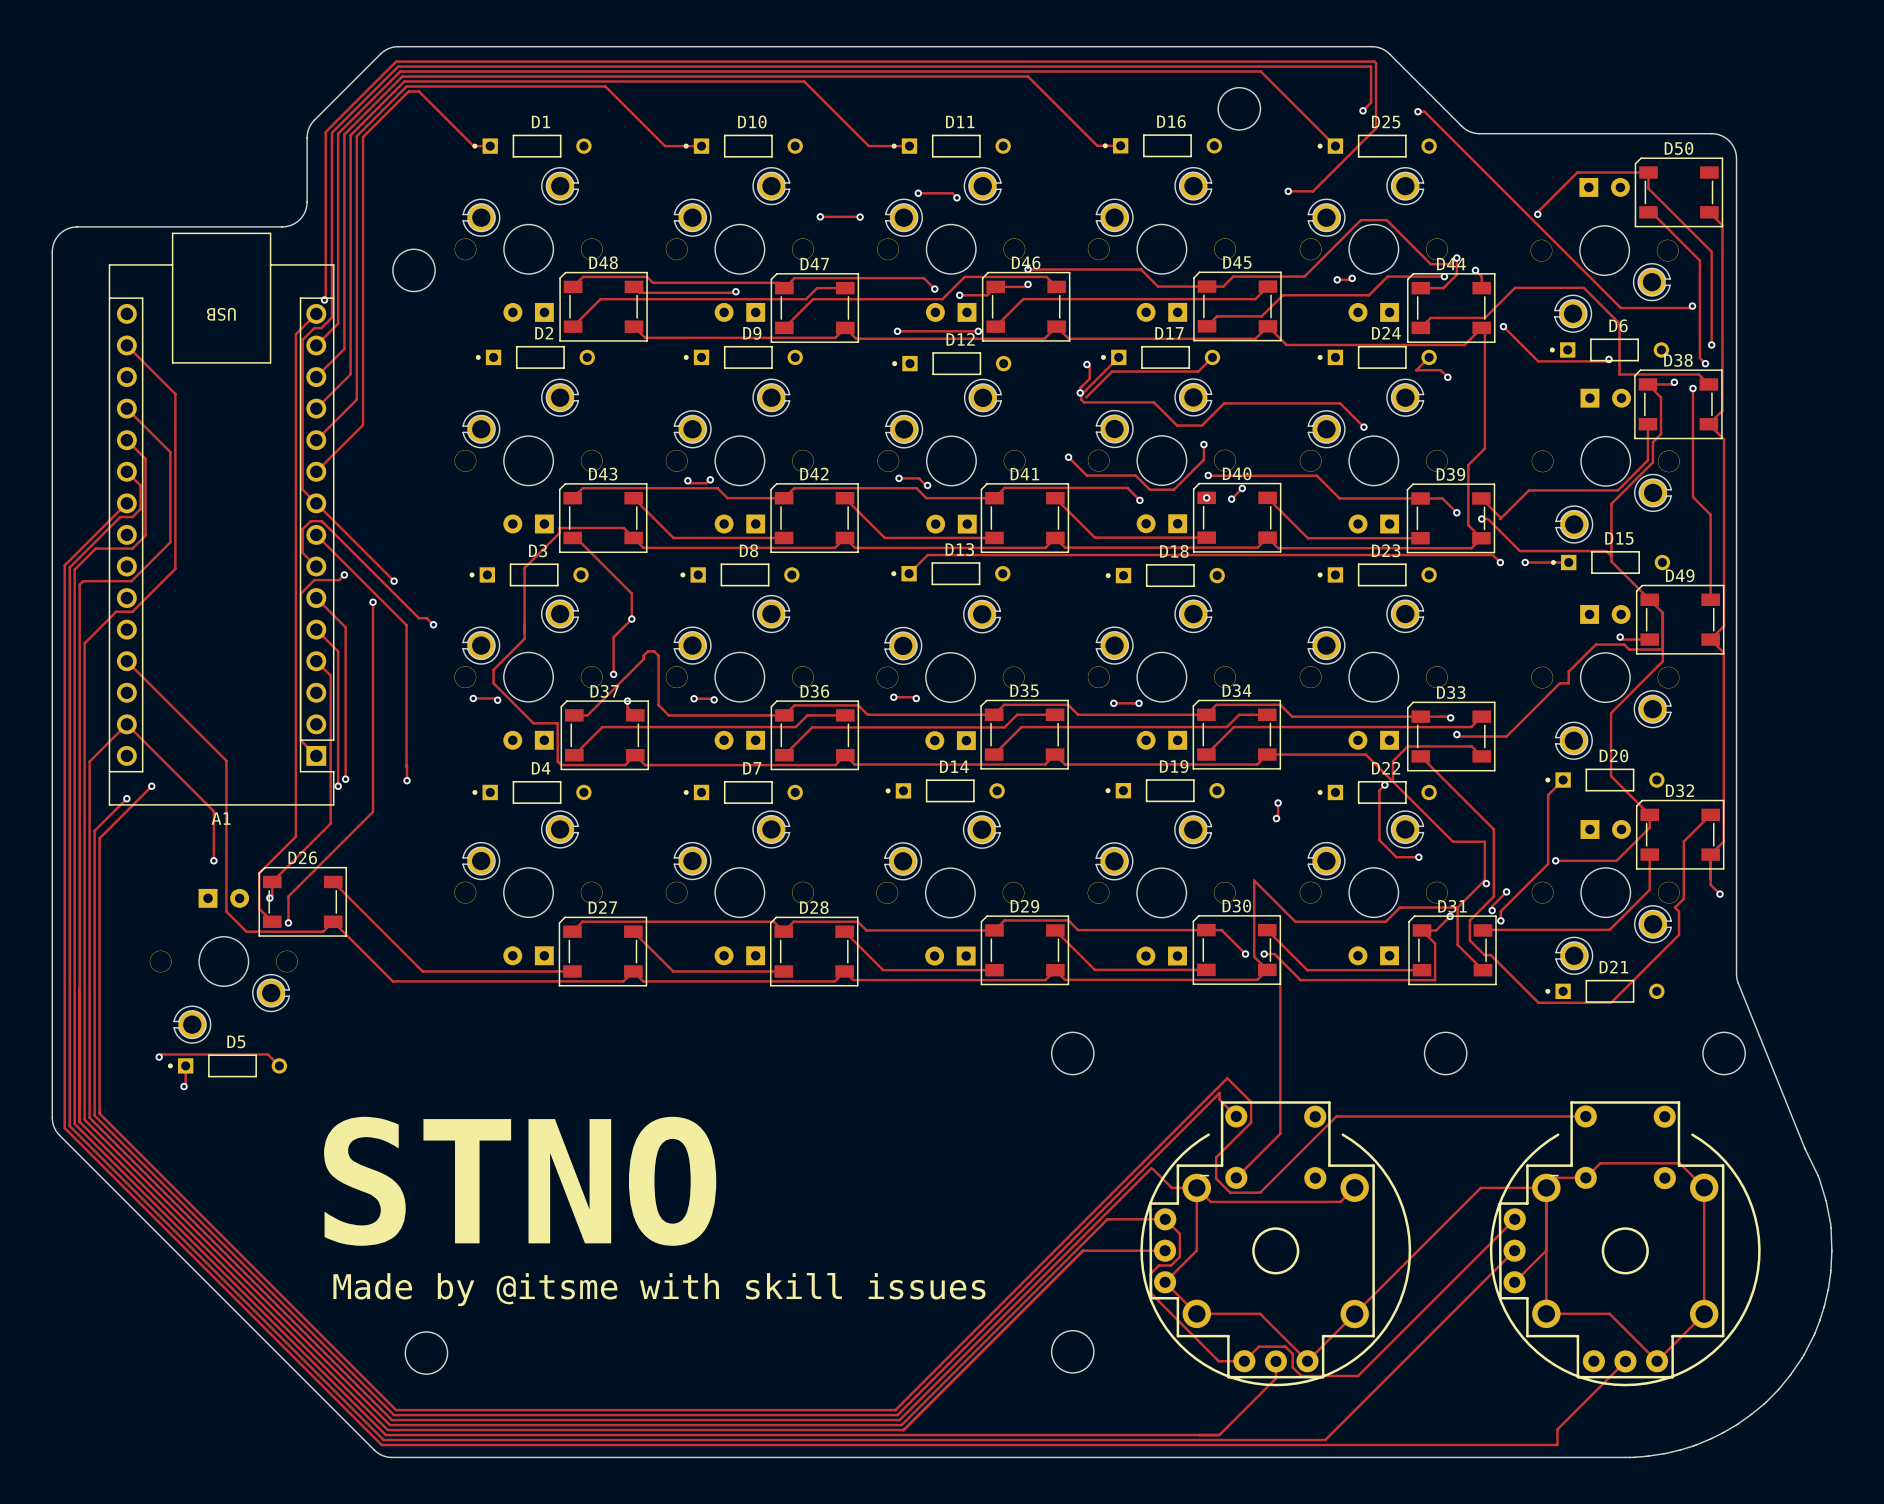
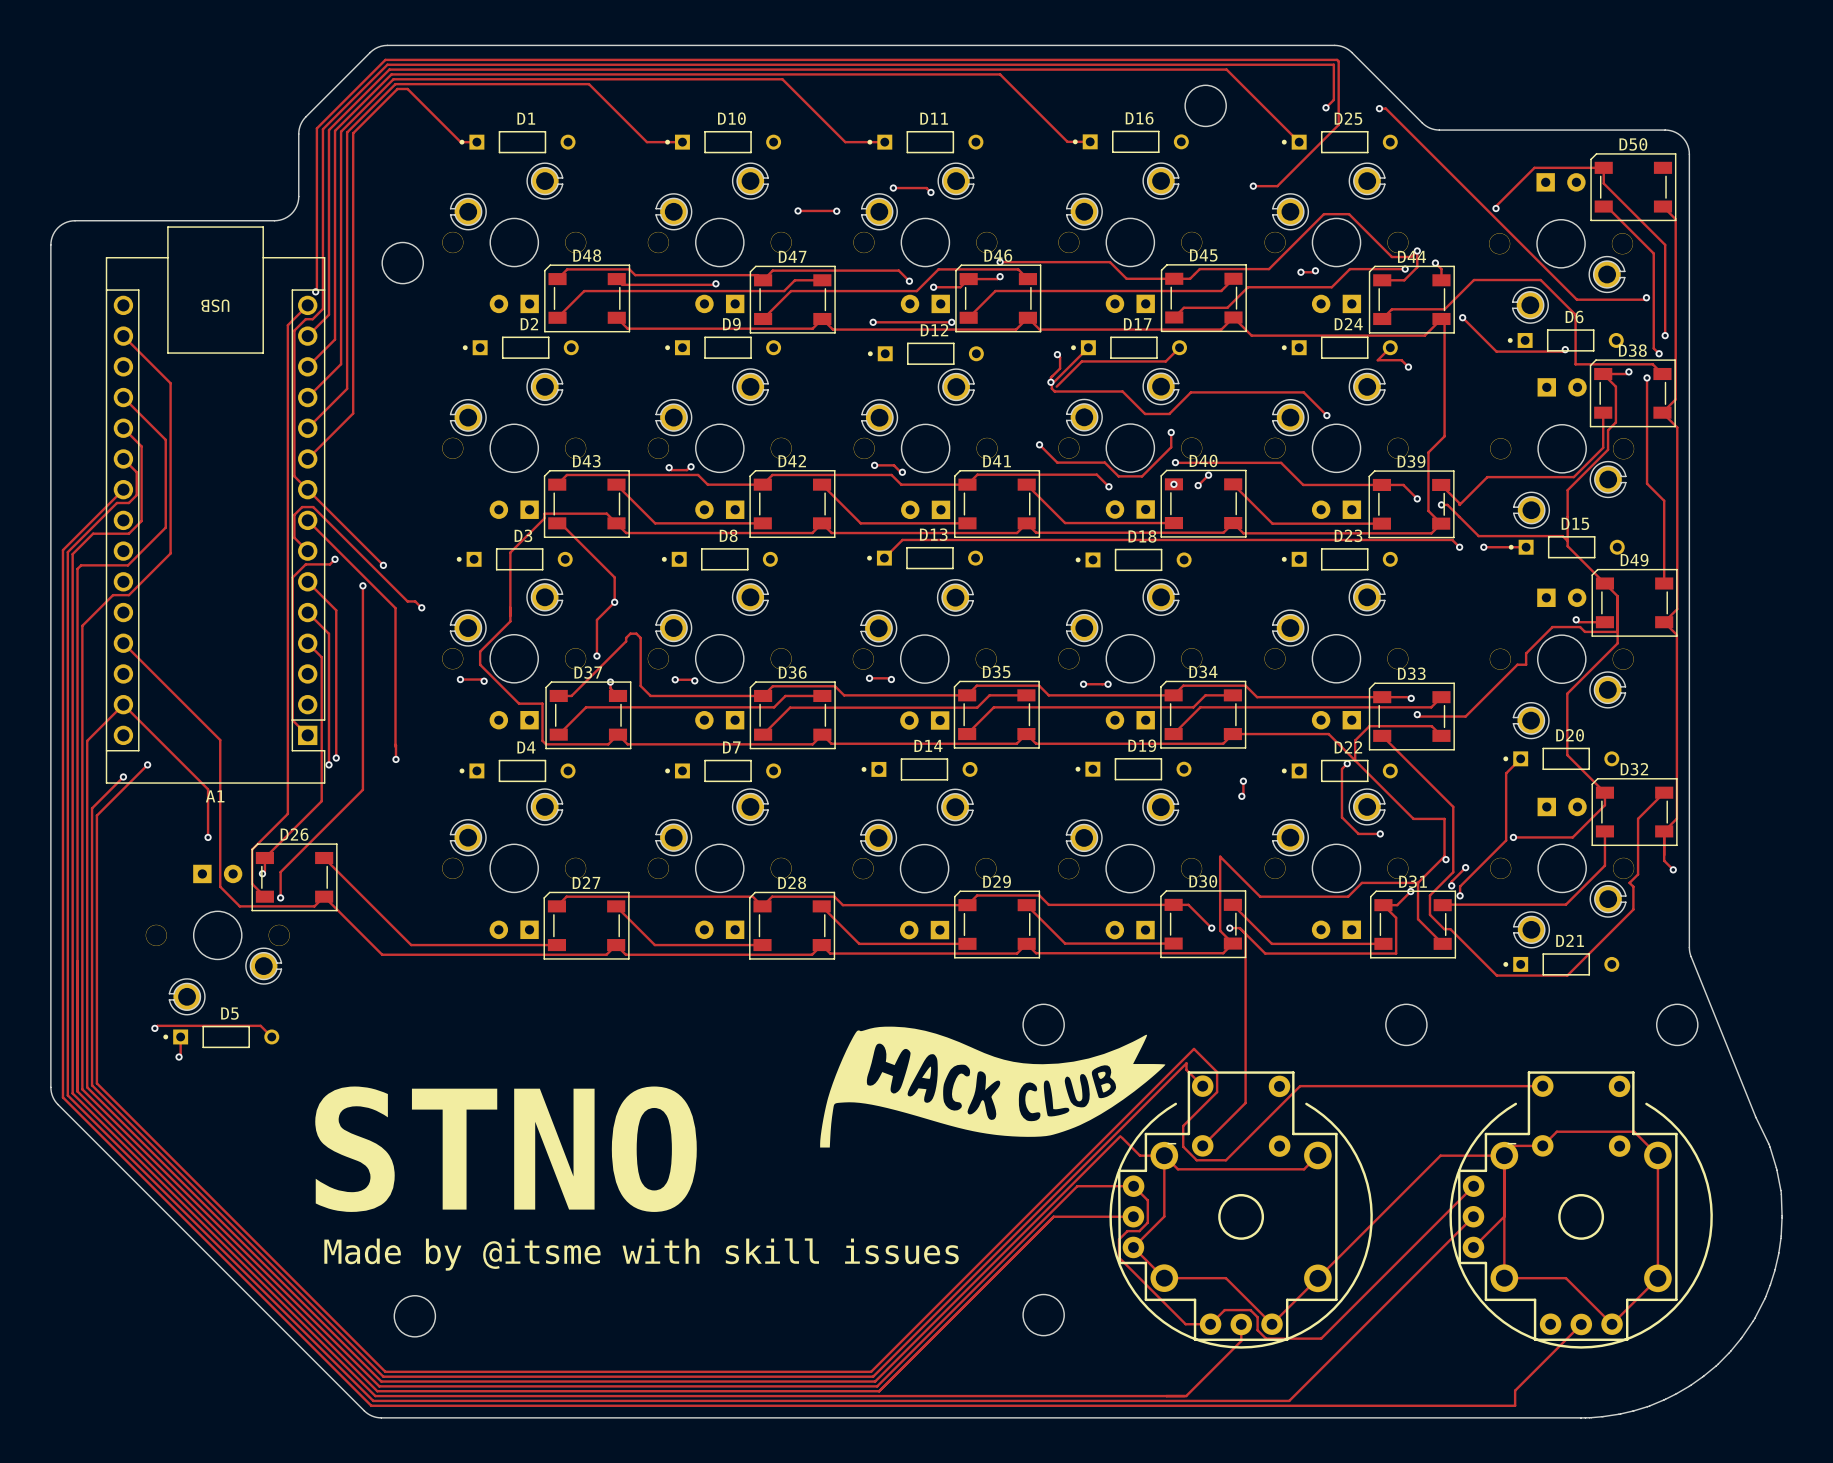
drawing: none -> [820, 1026, 1166, 1148]

